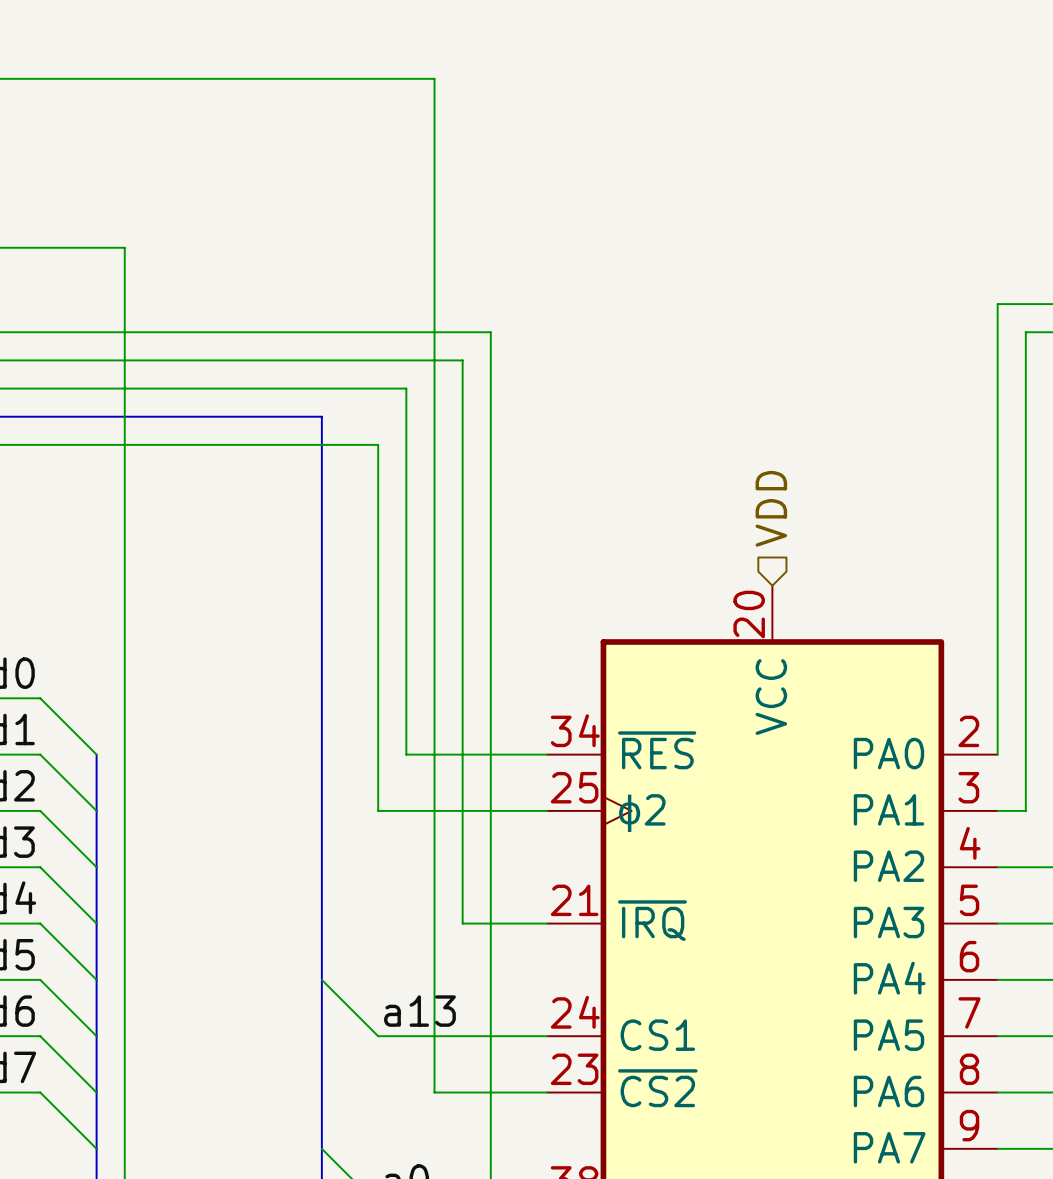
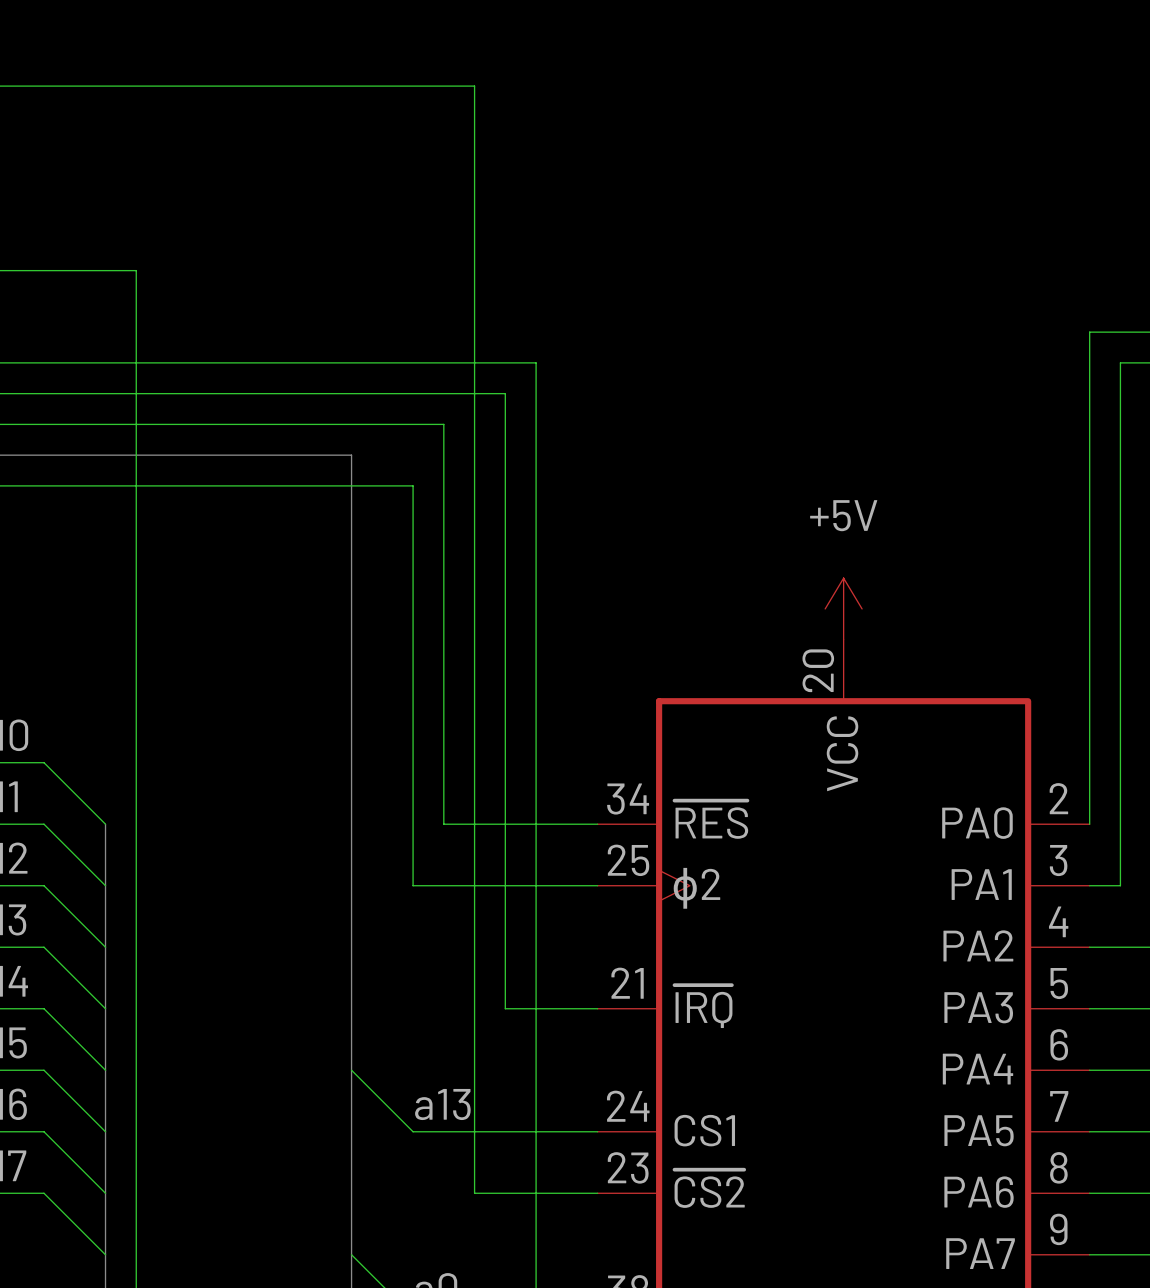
hierarchical label: VDD (771, 508) -> none
power symbol: none -> +5V (843, 608)

